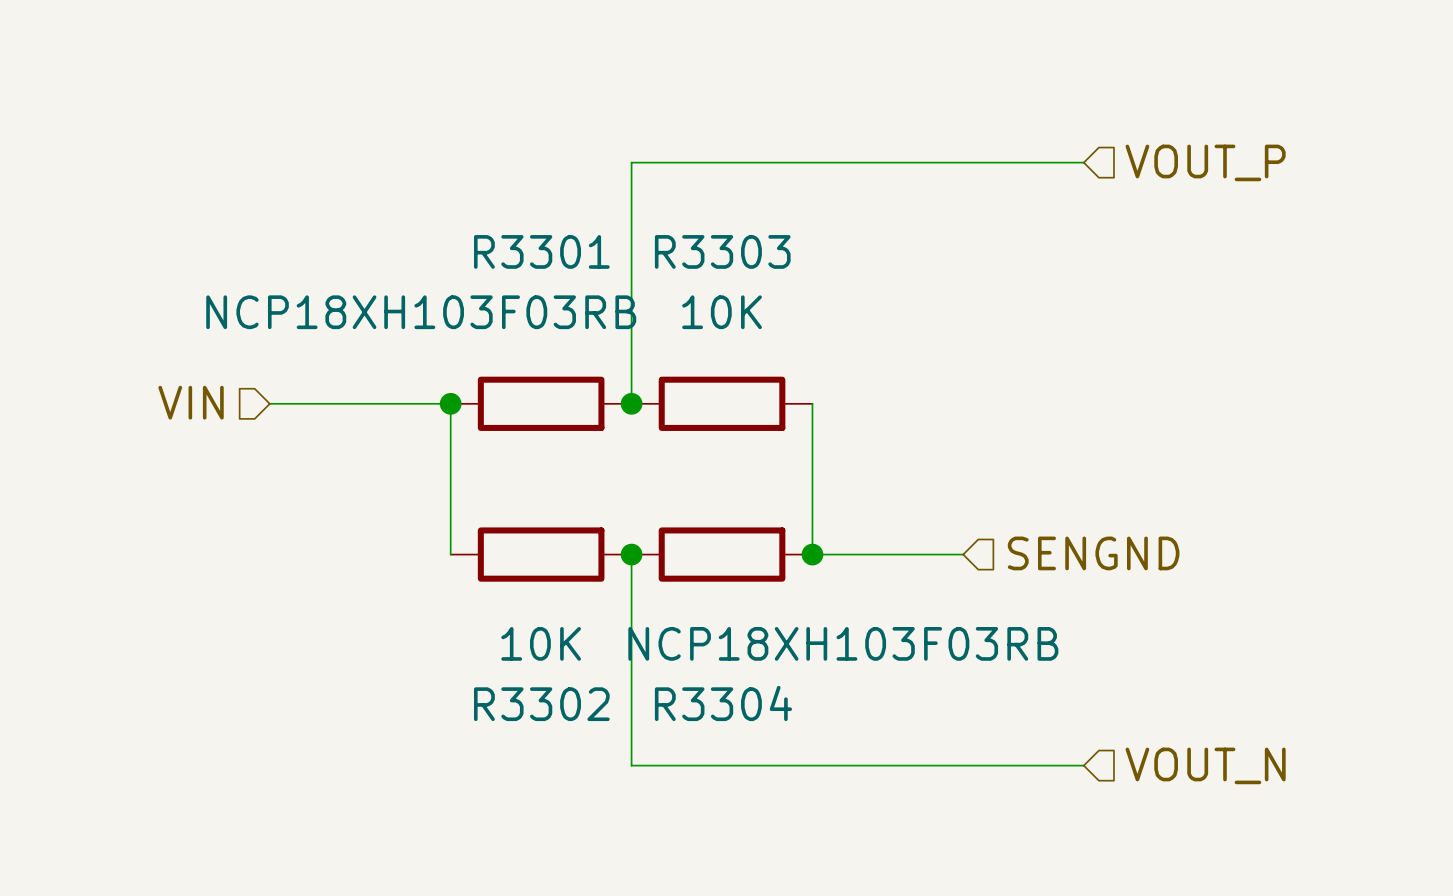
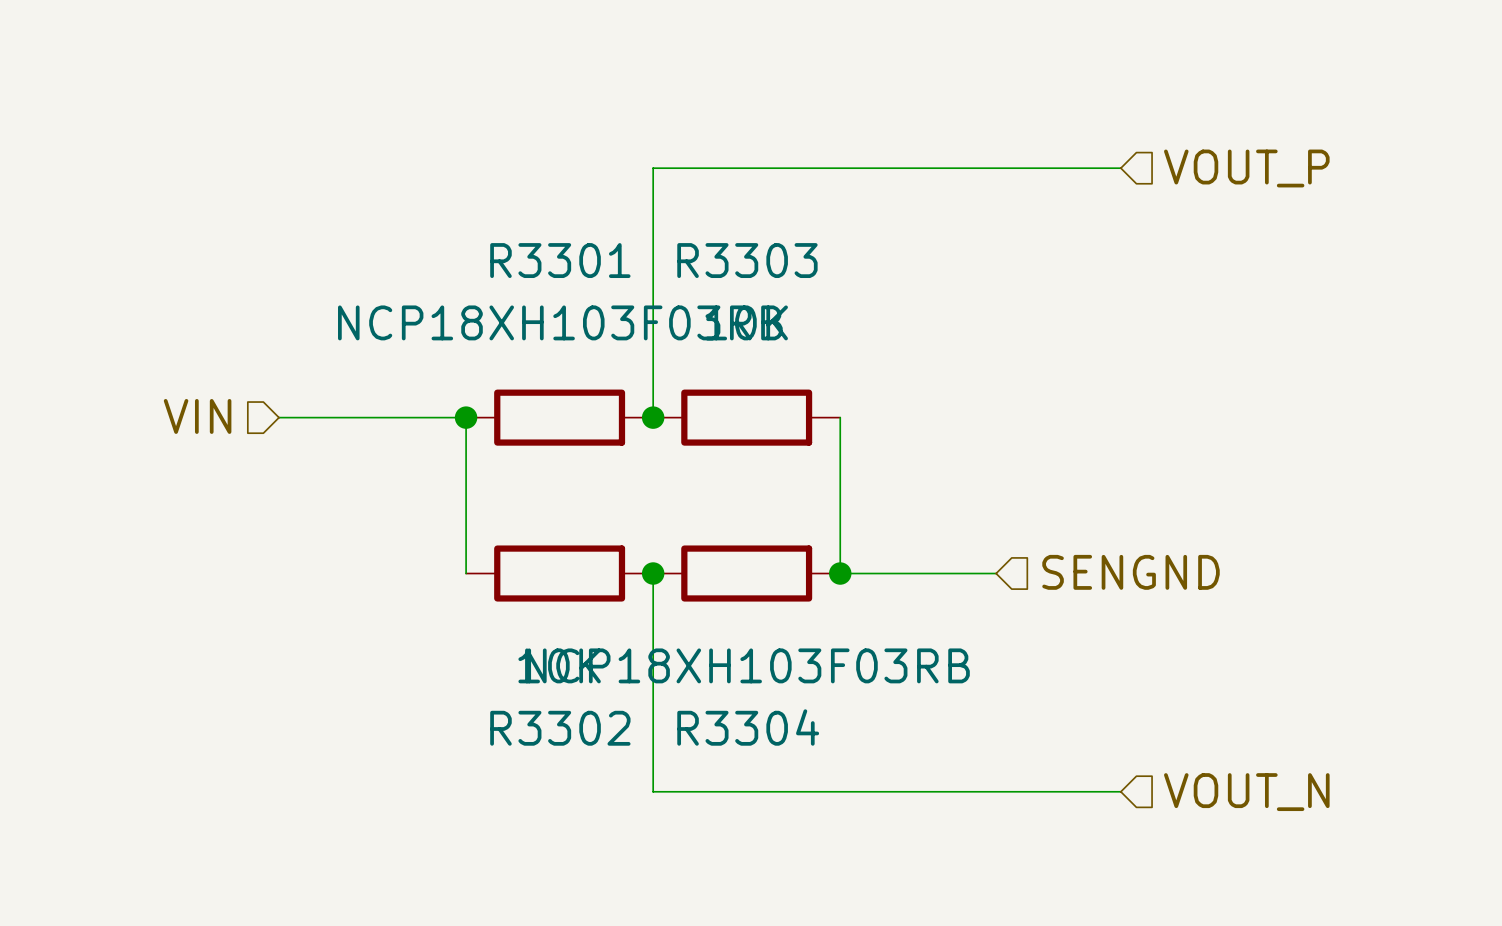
R3301 value position: NCP18XH103F03RB (421, 312) -> NCP18XH103F03RB (560, 322)
R3304 value position: NCP18XH103F03RB (843, 643) -> NCP18XH103F03RB (747, 665)

